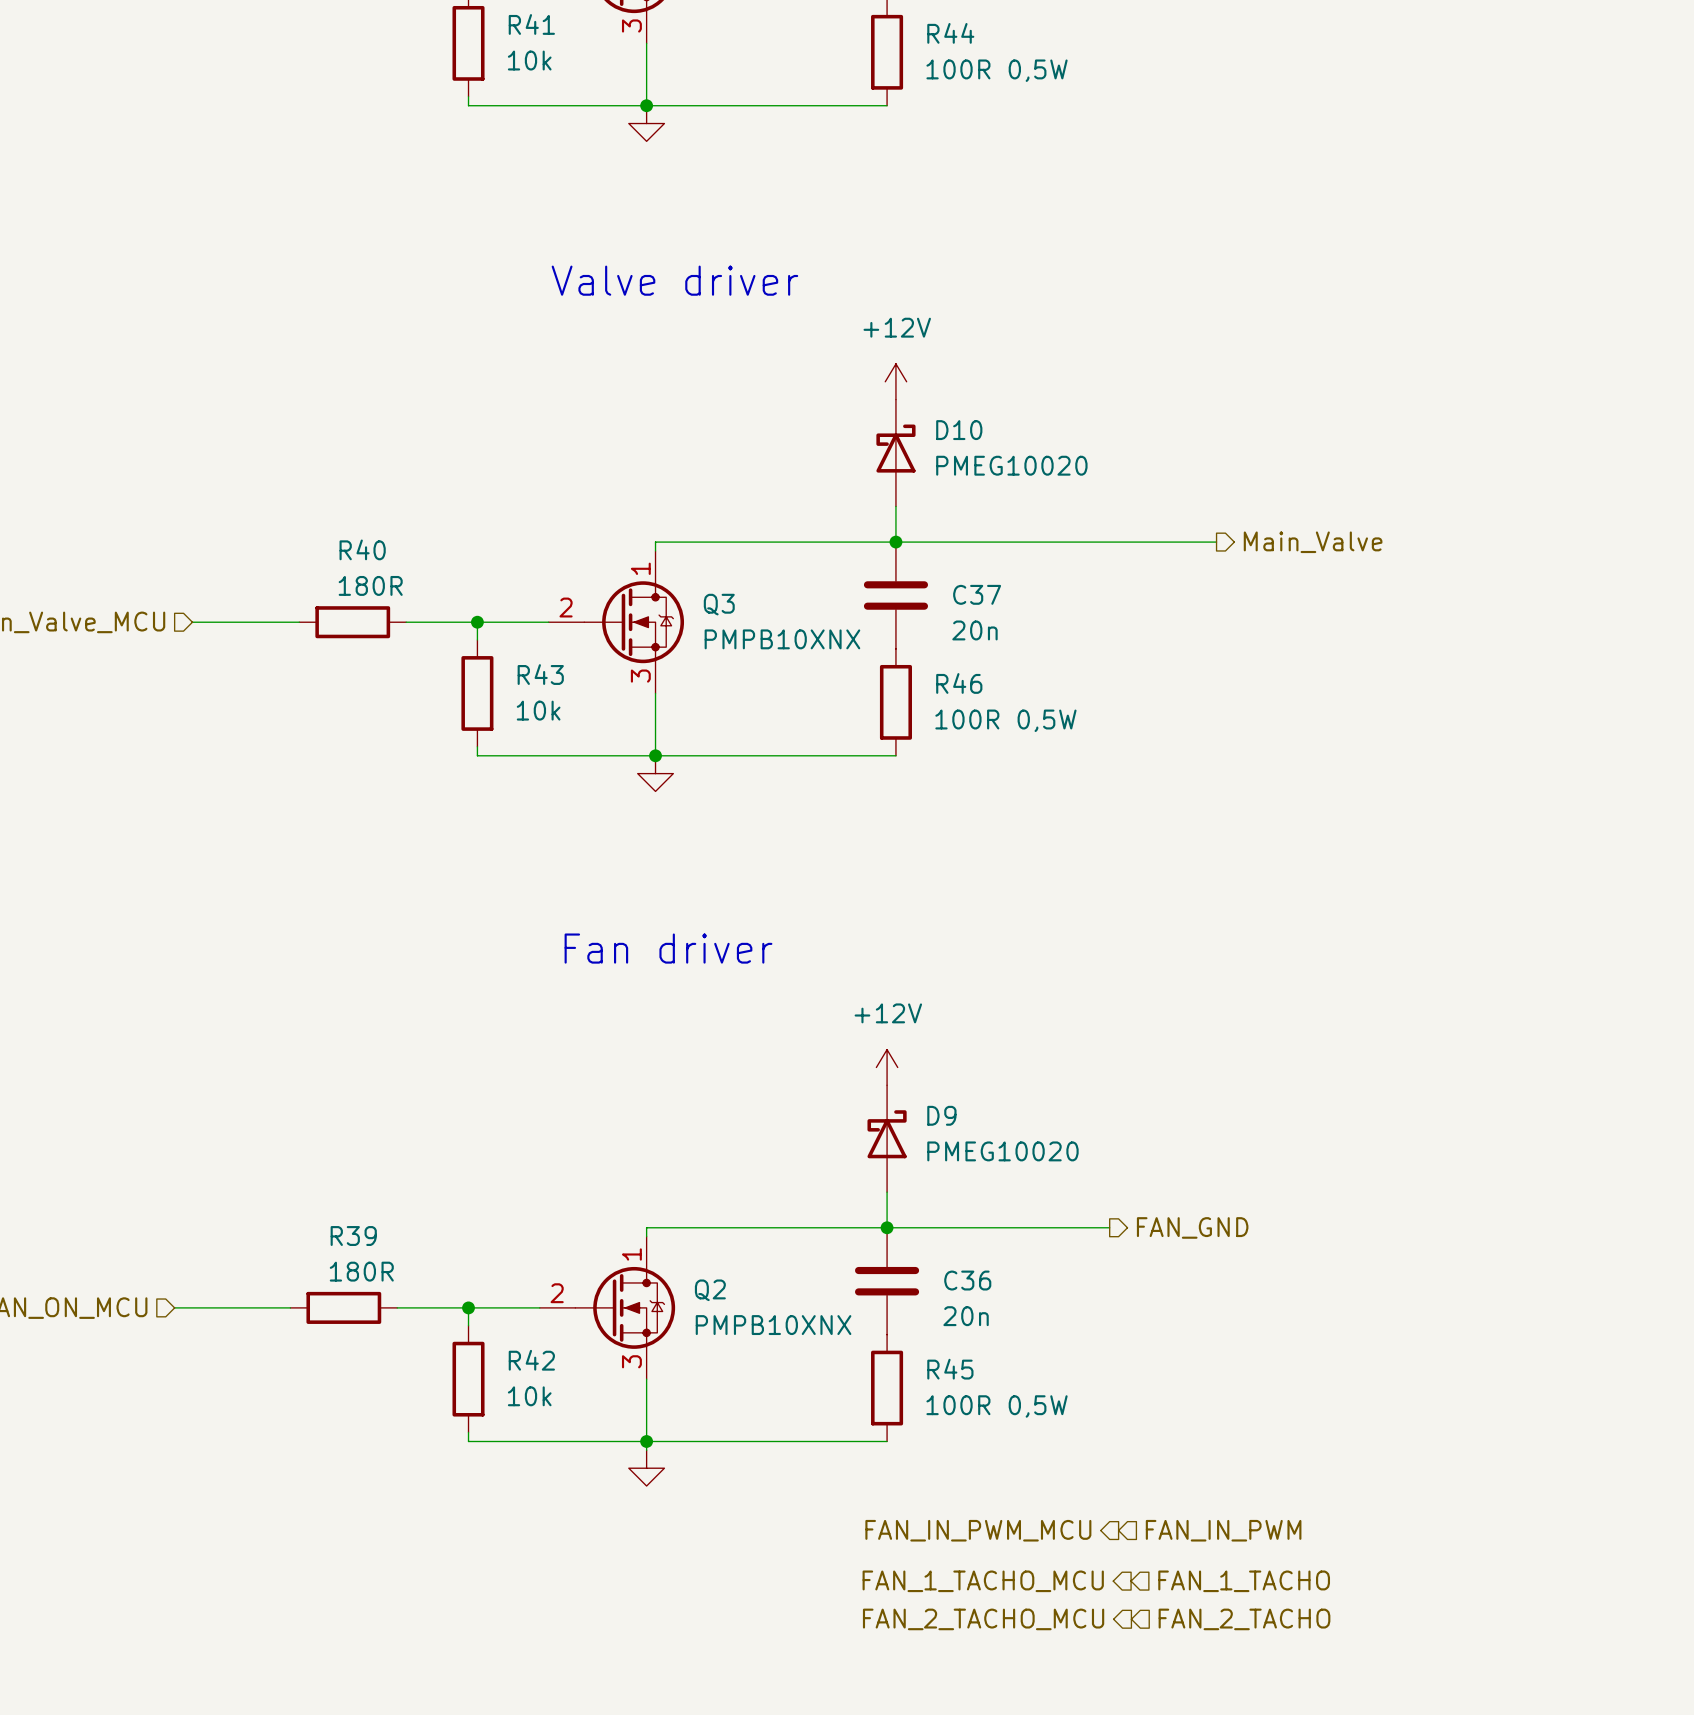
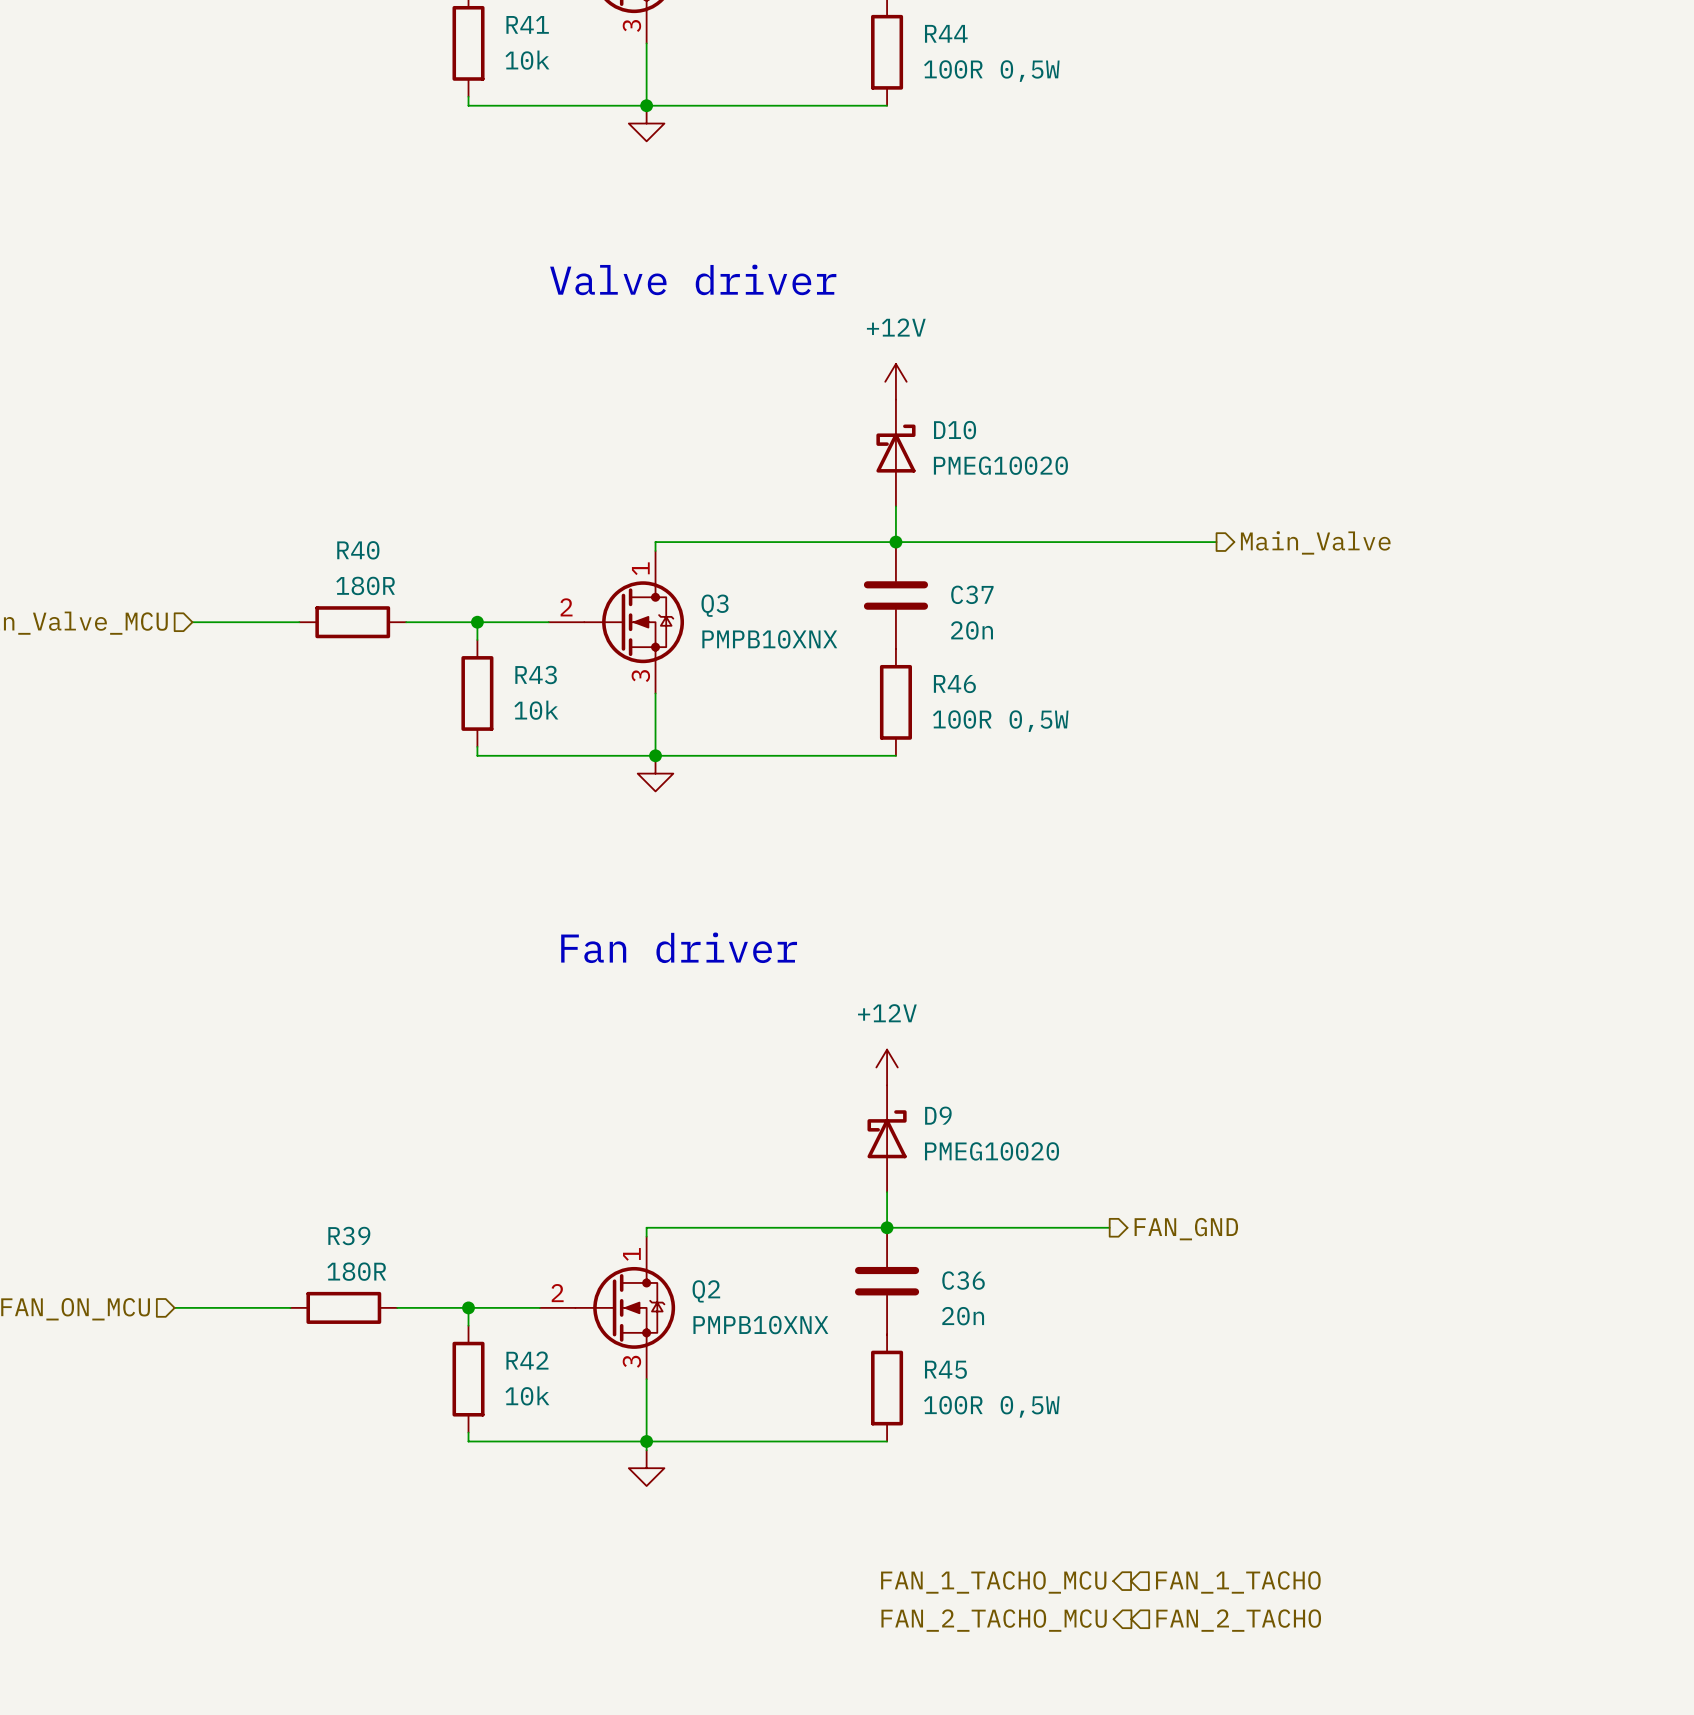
hierarchical label: FAN_IN_PWM_MCU (978, 1530) -> none
hierarchical label: FAN_IN_PWM (1223, 1530) -> none

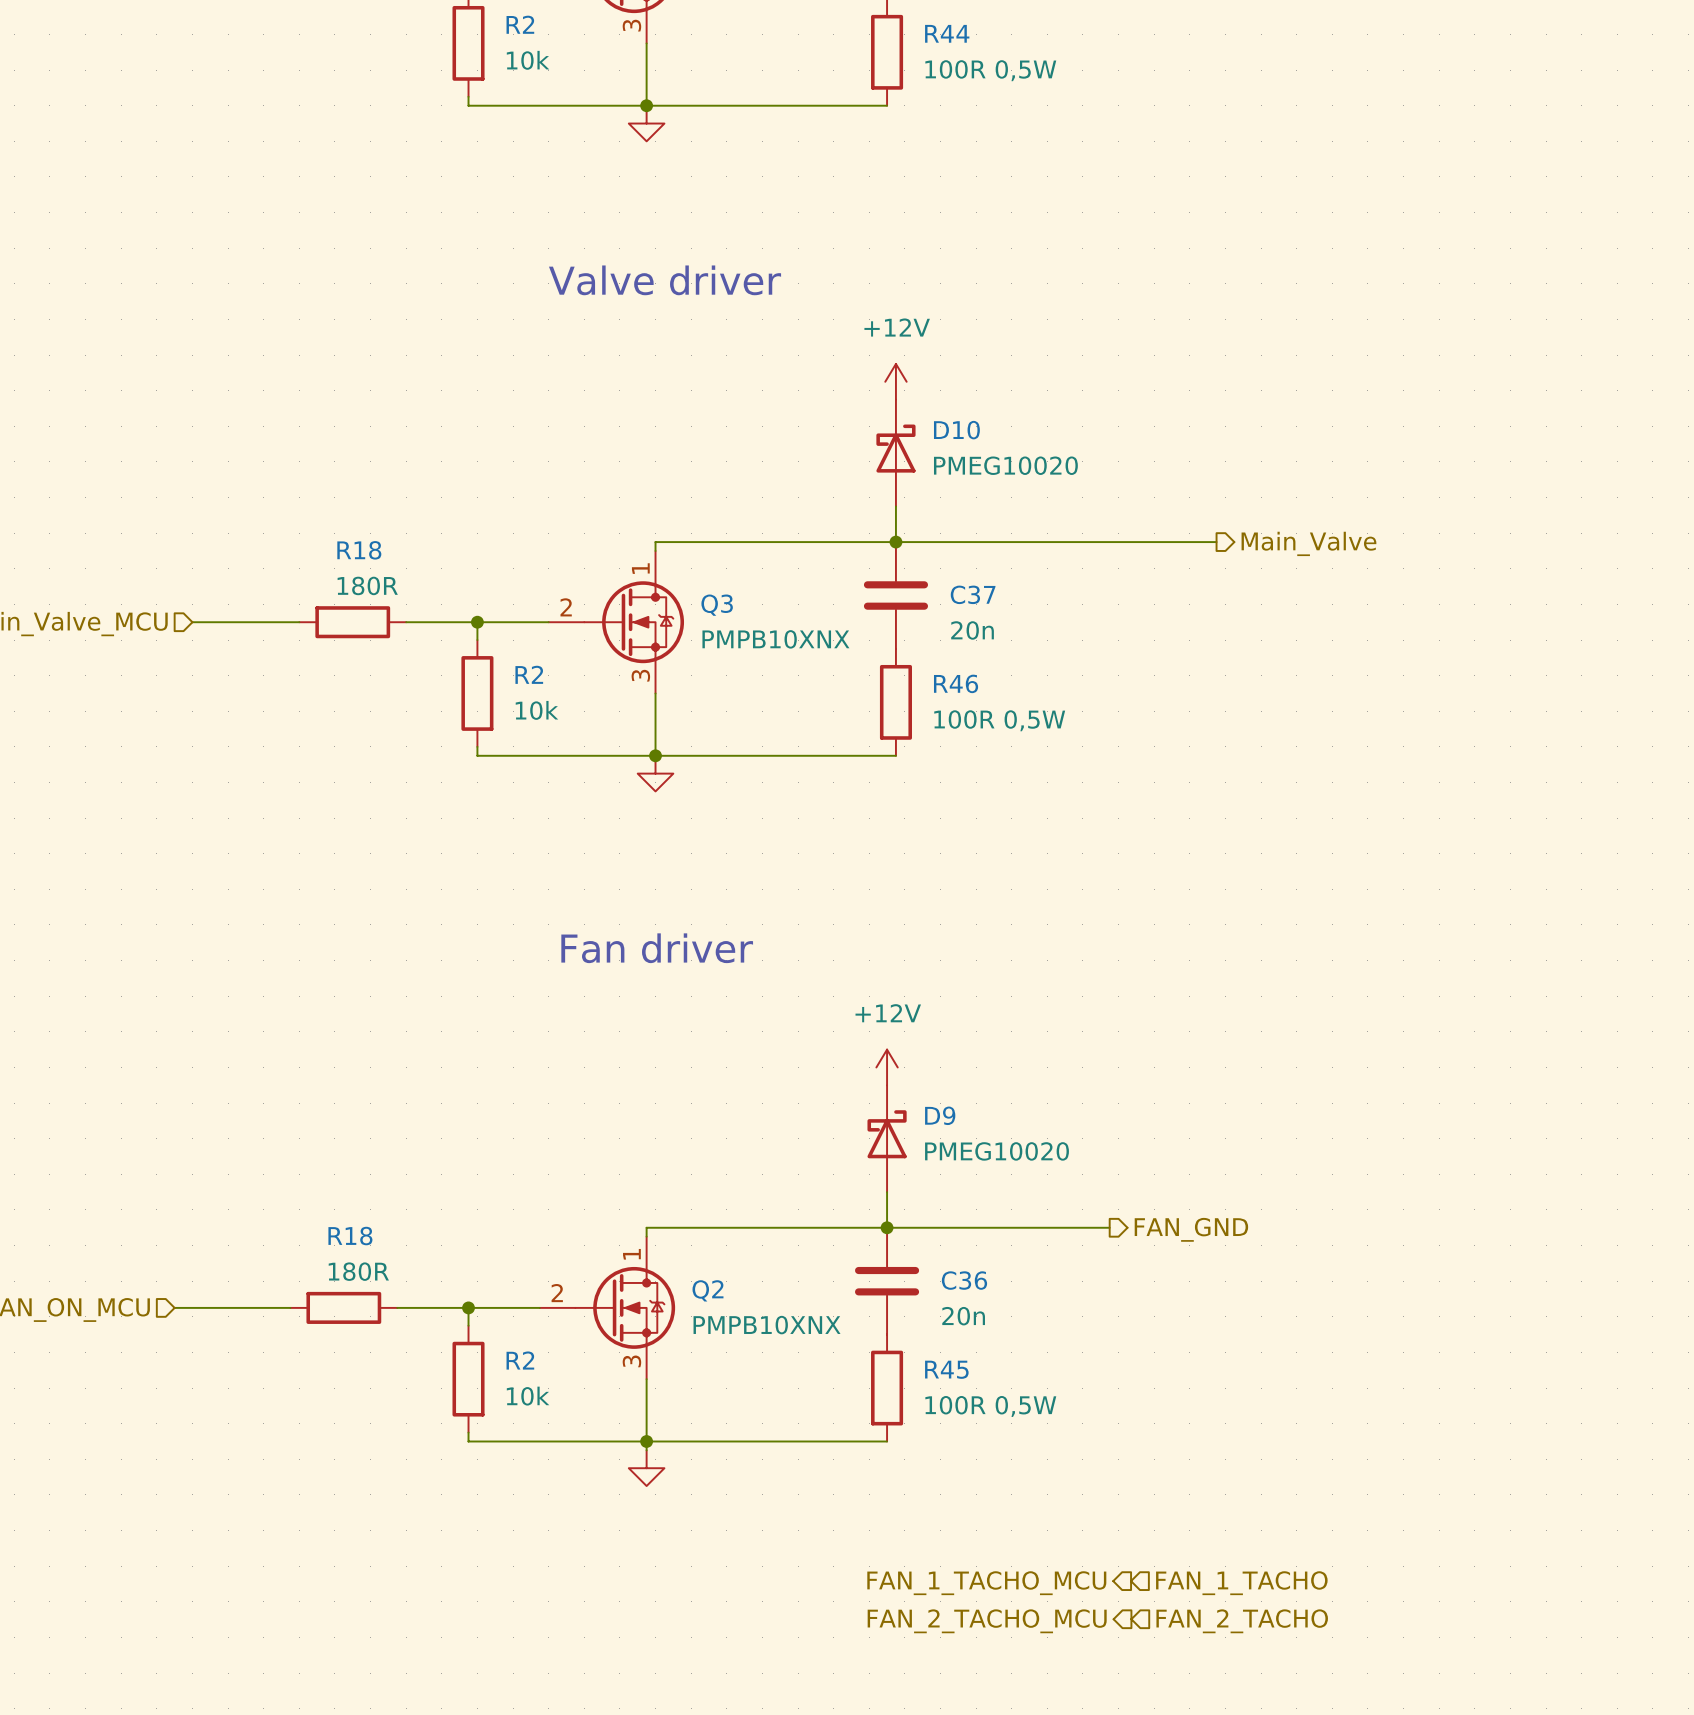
R41 name: R41 (527, 24) -> R2 (520, 24)
R40 name: R40 (358, 550) -> R18 (359, 550)
R43 name: R43 (536, 674) -> R2 (529, 674)
R39 name: R39 (349, 1236) -> R18 (350, 1236)
R42 name: R42 (527, 1360) -> R2 (520, 1360)

